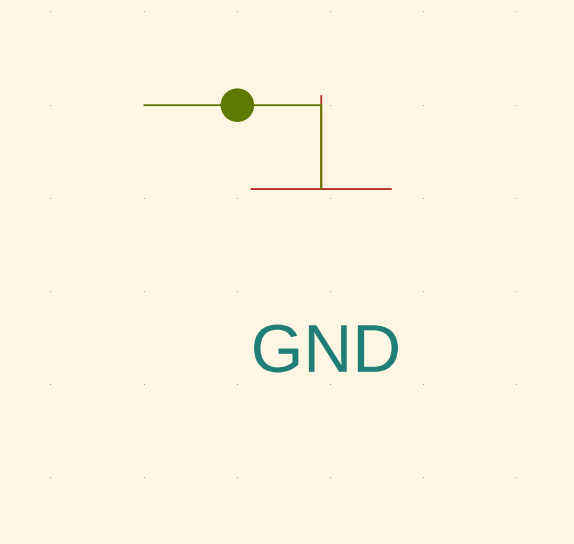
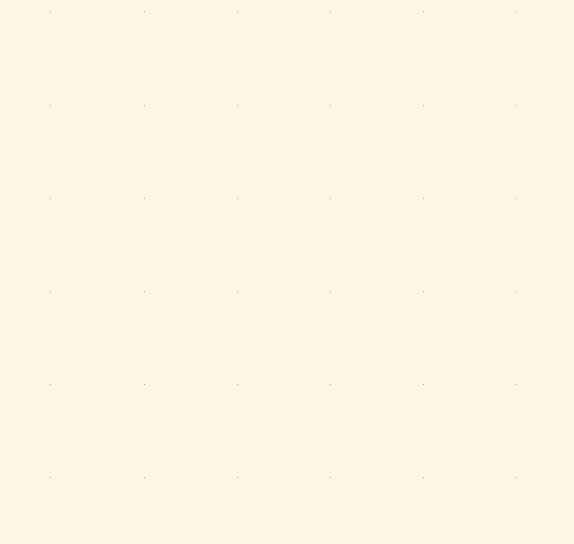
wire: (144, 105) (321, 105) (321, 189) -> none
junction: (237, 105) -> none
power symbol: GND (321, 142) -> none

